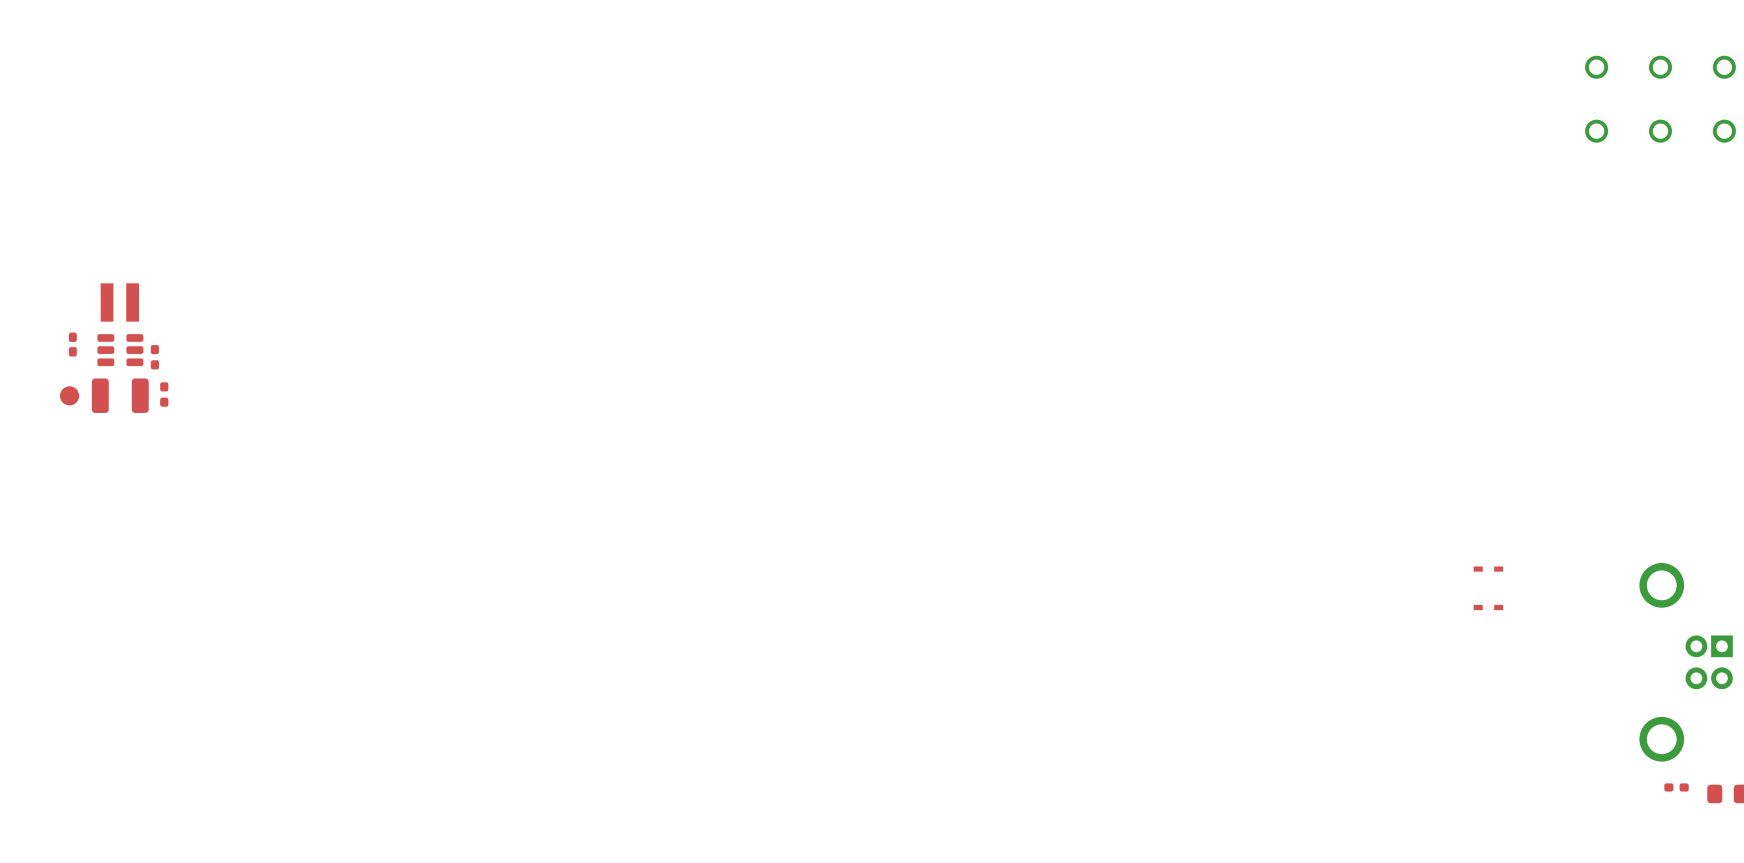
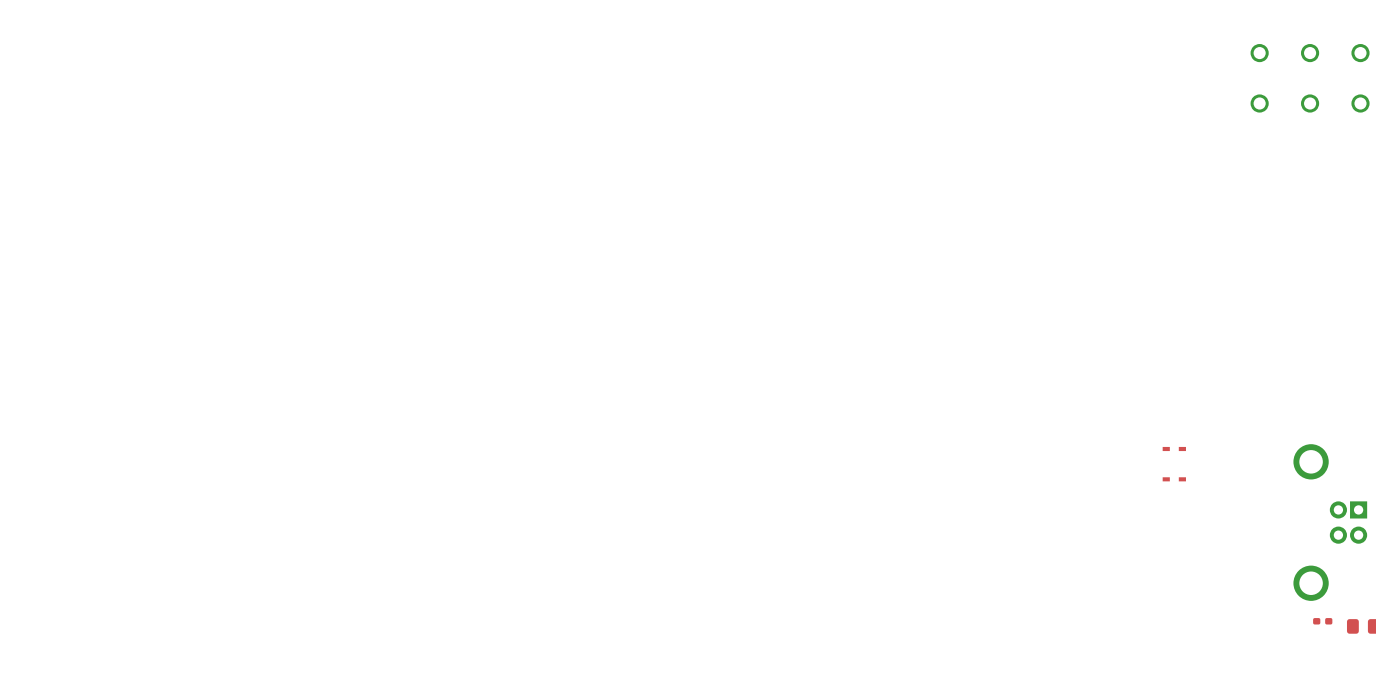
part: (119, 302) -> none
part: (72, 344) -> none
part: (120, 350) -> none
part: (154, 357) -> none
part: (164, 394) -> none
part: (69, 395) -> none
part: (120, 395) -> none

